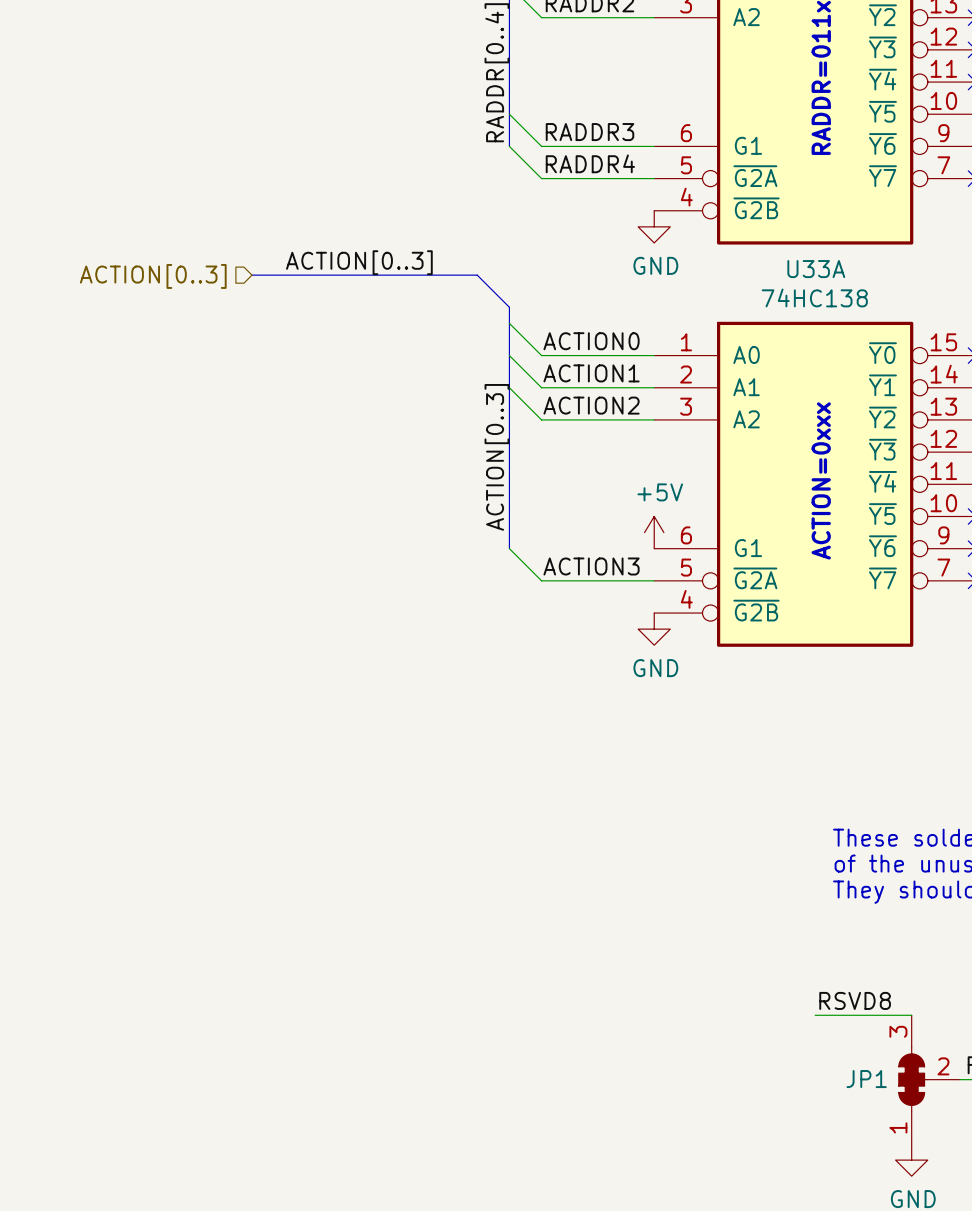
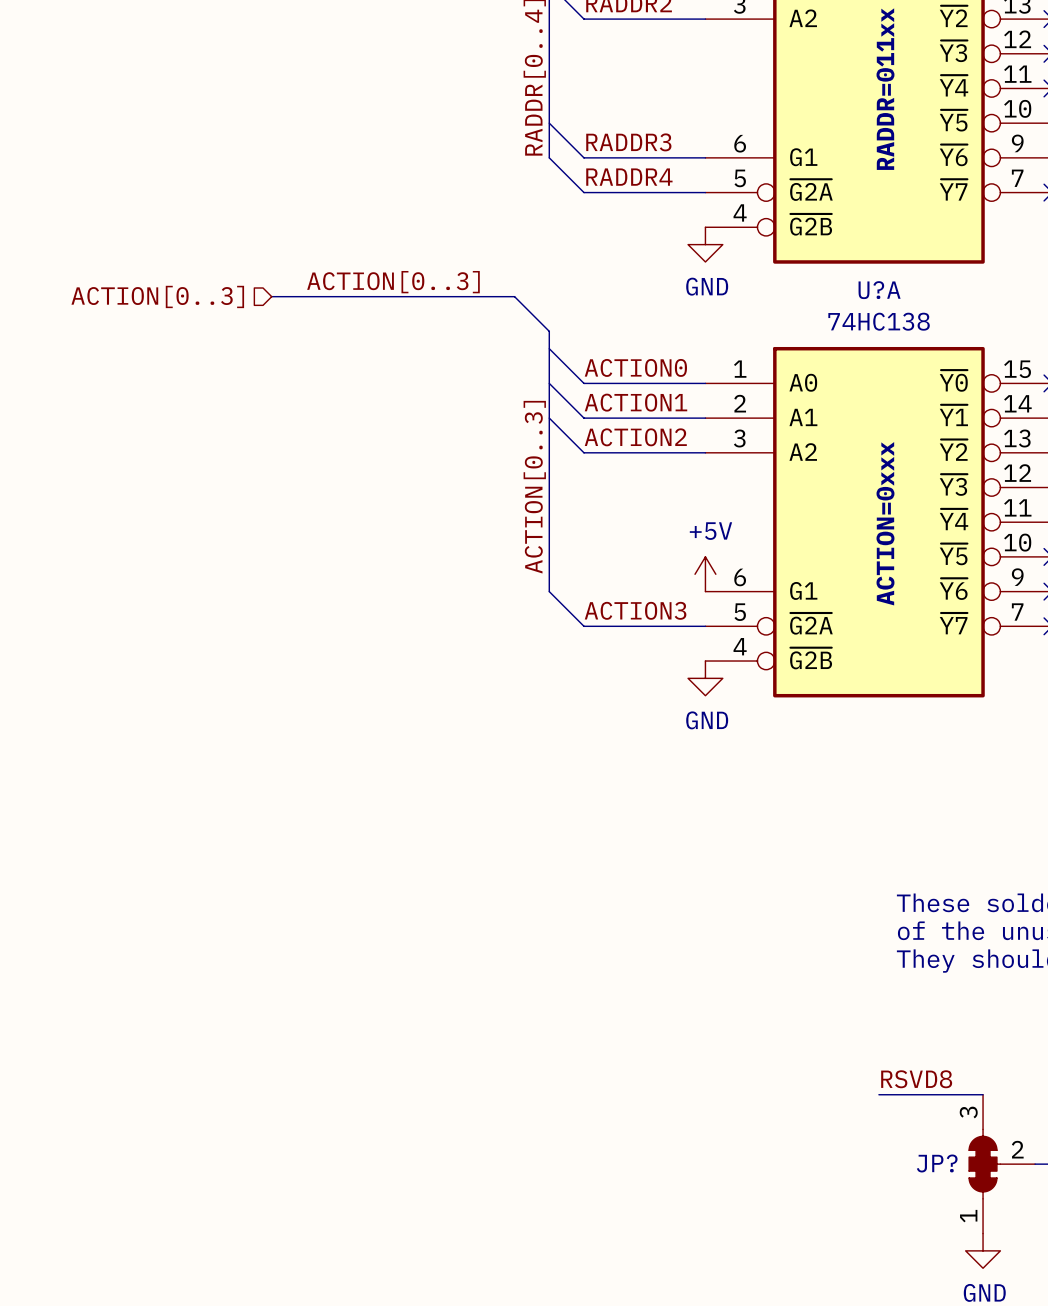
U33A name: U33A (816, 269) -> U?A (879, 290)
JP1 name: JP1 (866, 1079) -> JP? (937, 1163)

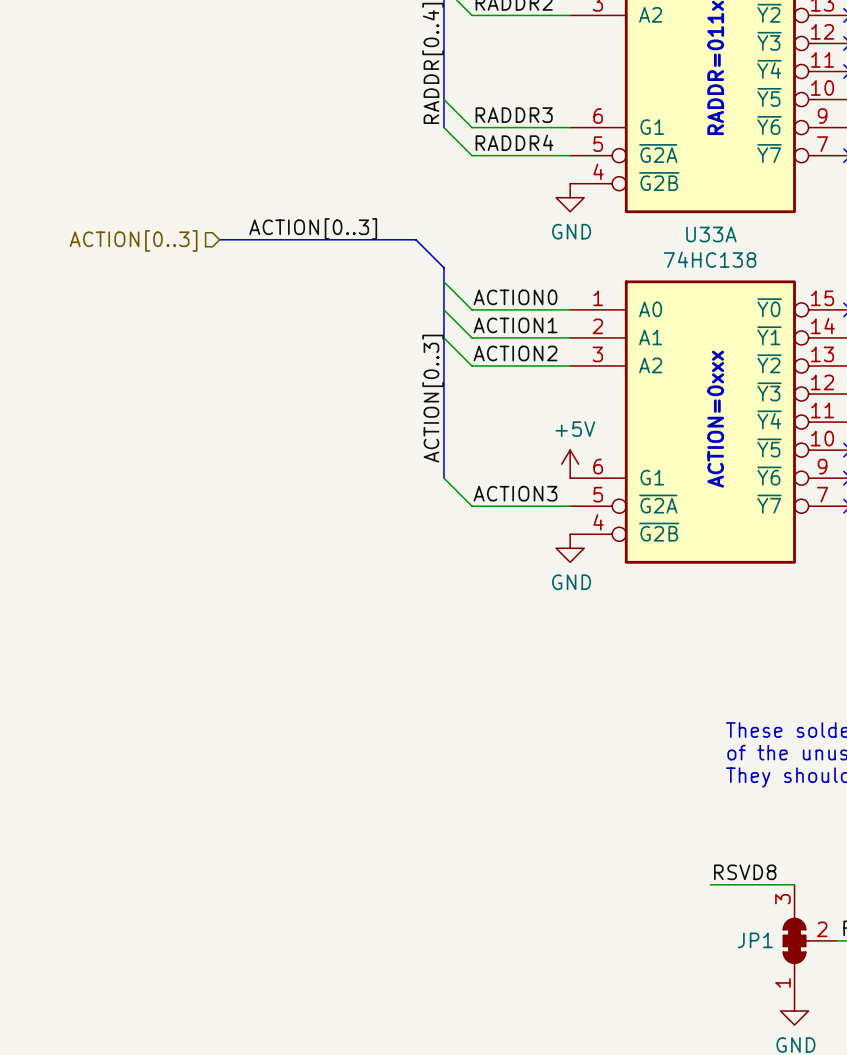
U?A name: U?A (879, 290) -> U33A (711, 234)
JP? name: JP? (937, 1163) -> JP1 (755, 940)

